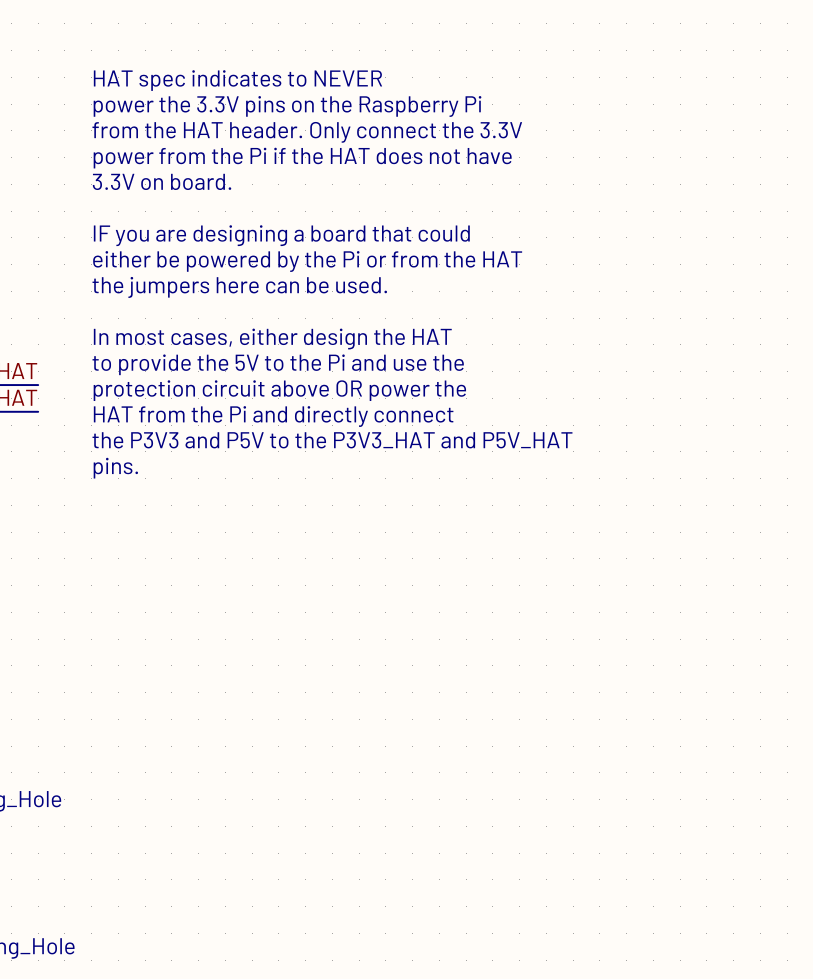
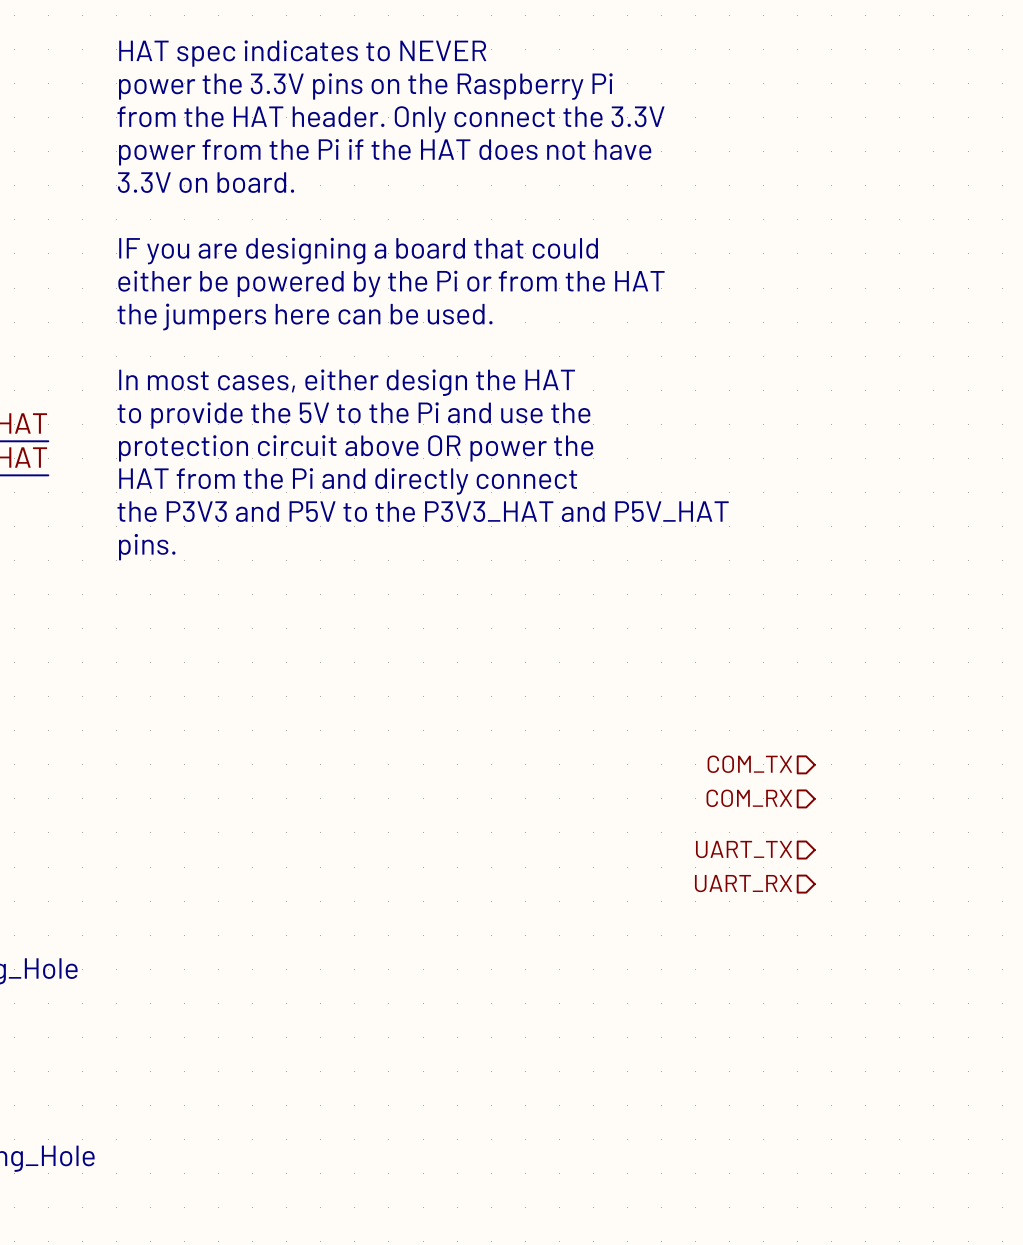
hierarchical label: none -> COM_TX (749, 764)
hierarchical label: none -> COM_RX (749, 798)
hierarchical label: none -> UART_TX (744, 849)
hierarchical label: none -> UART_RX (743, 883)

